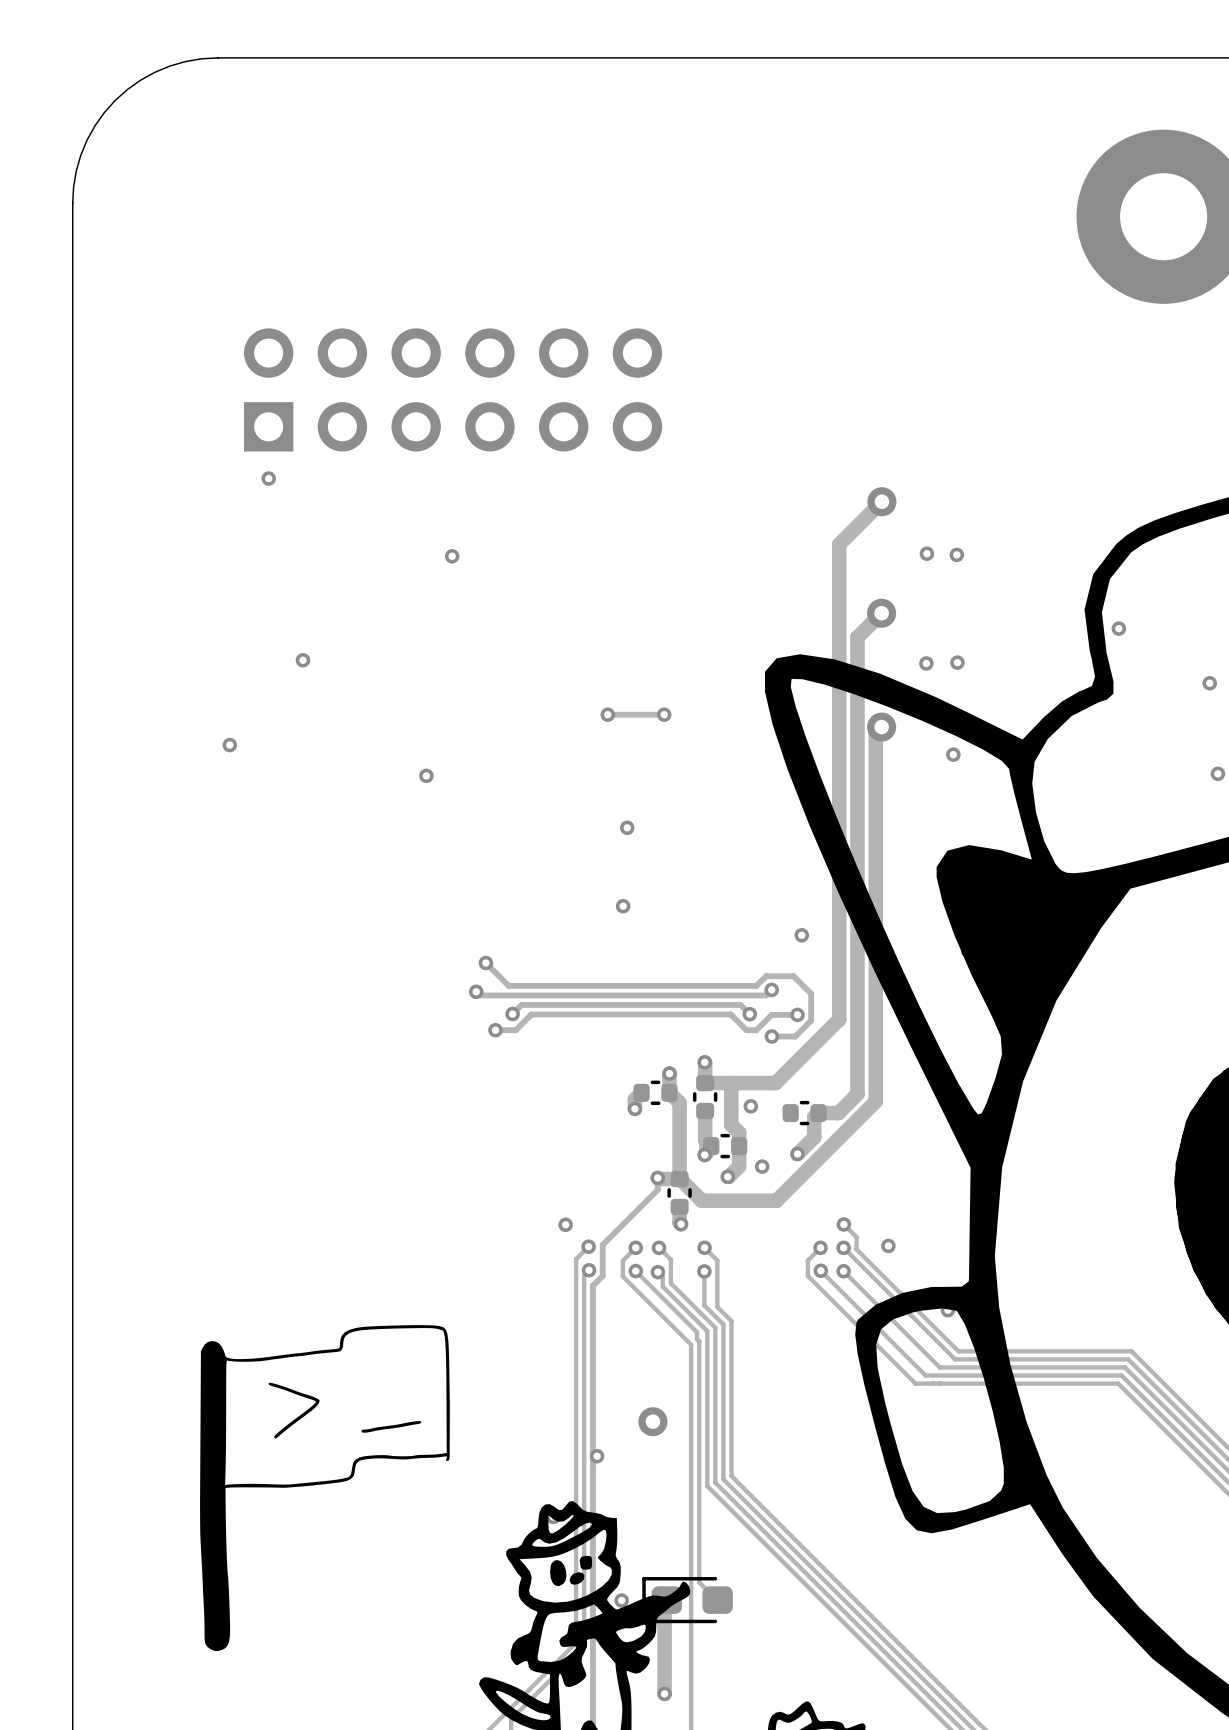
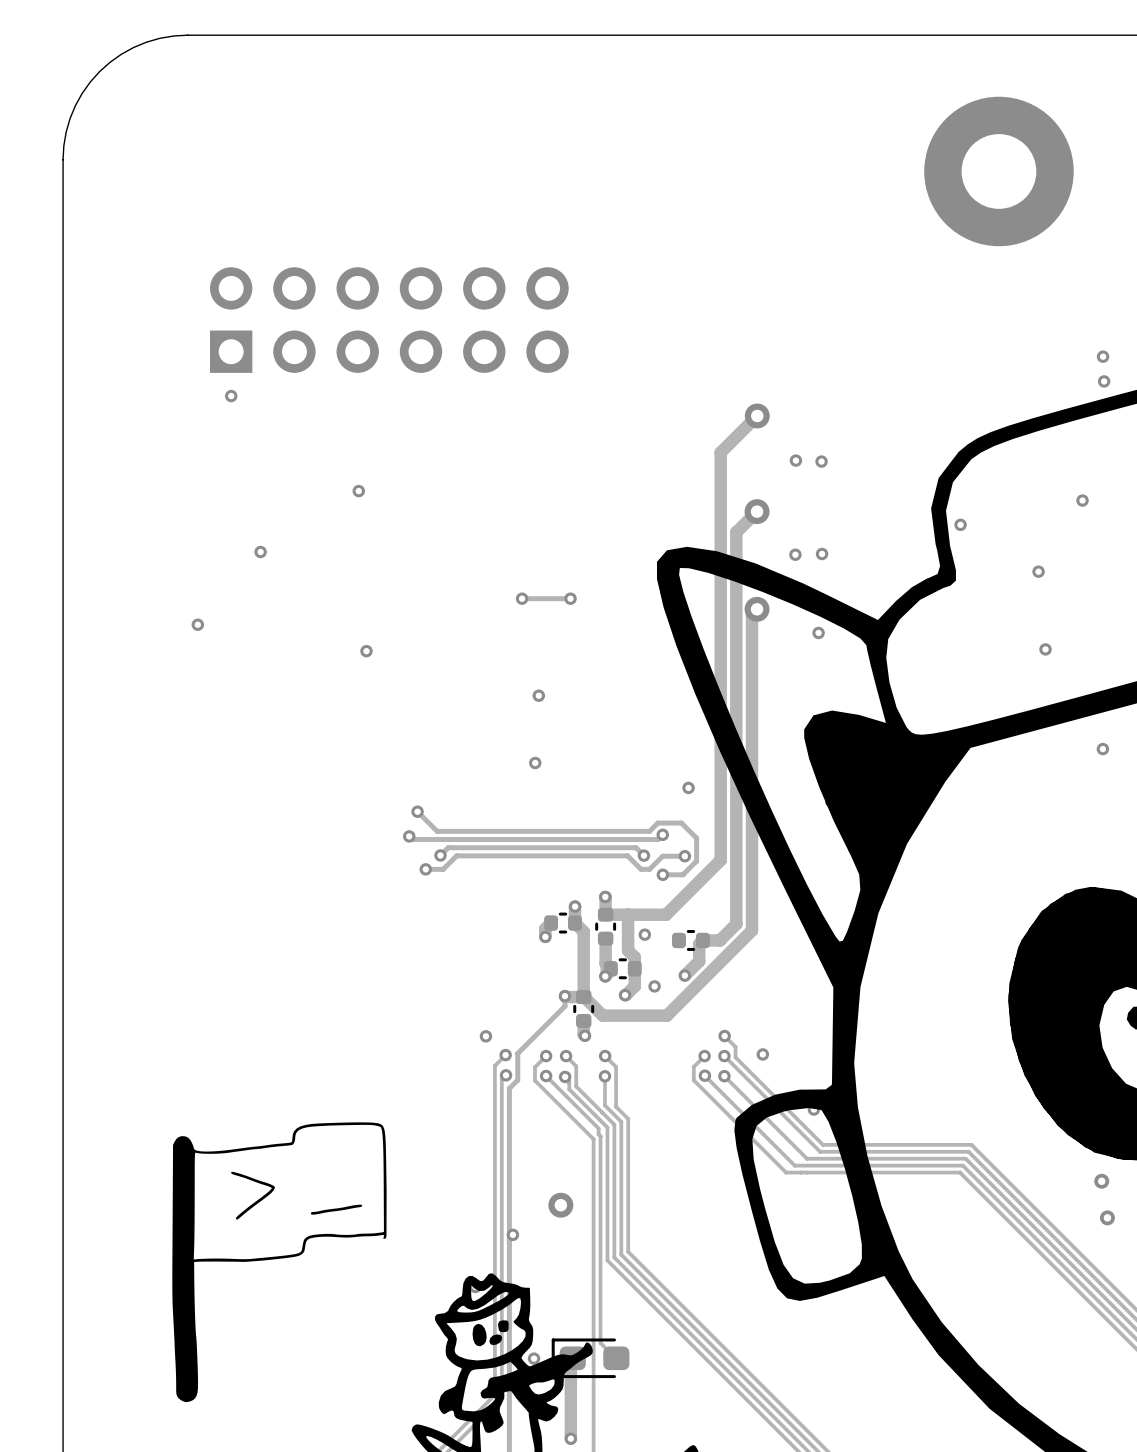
via position: (452, 556) -> (358, 491)

